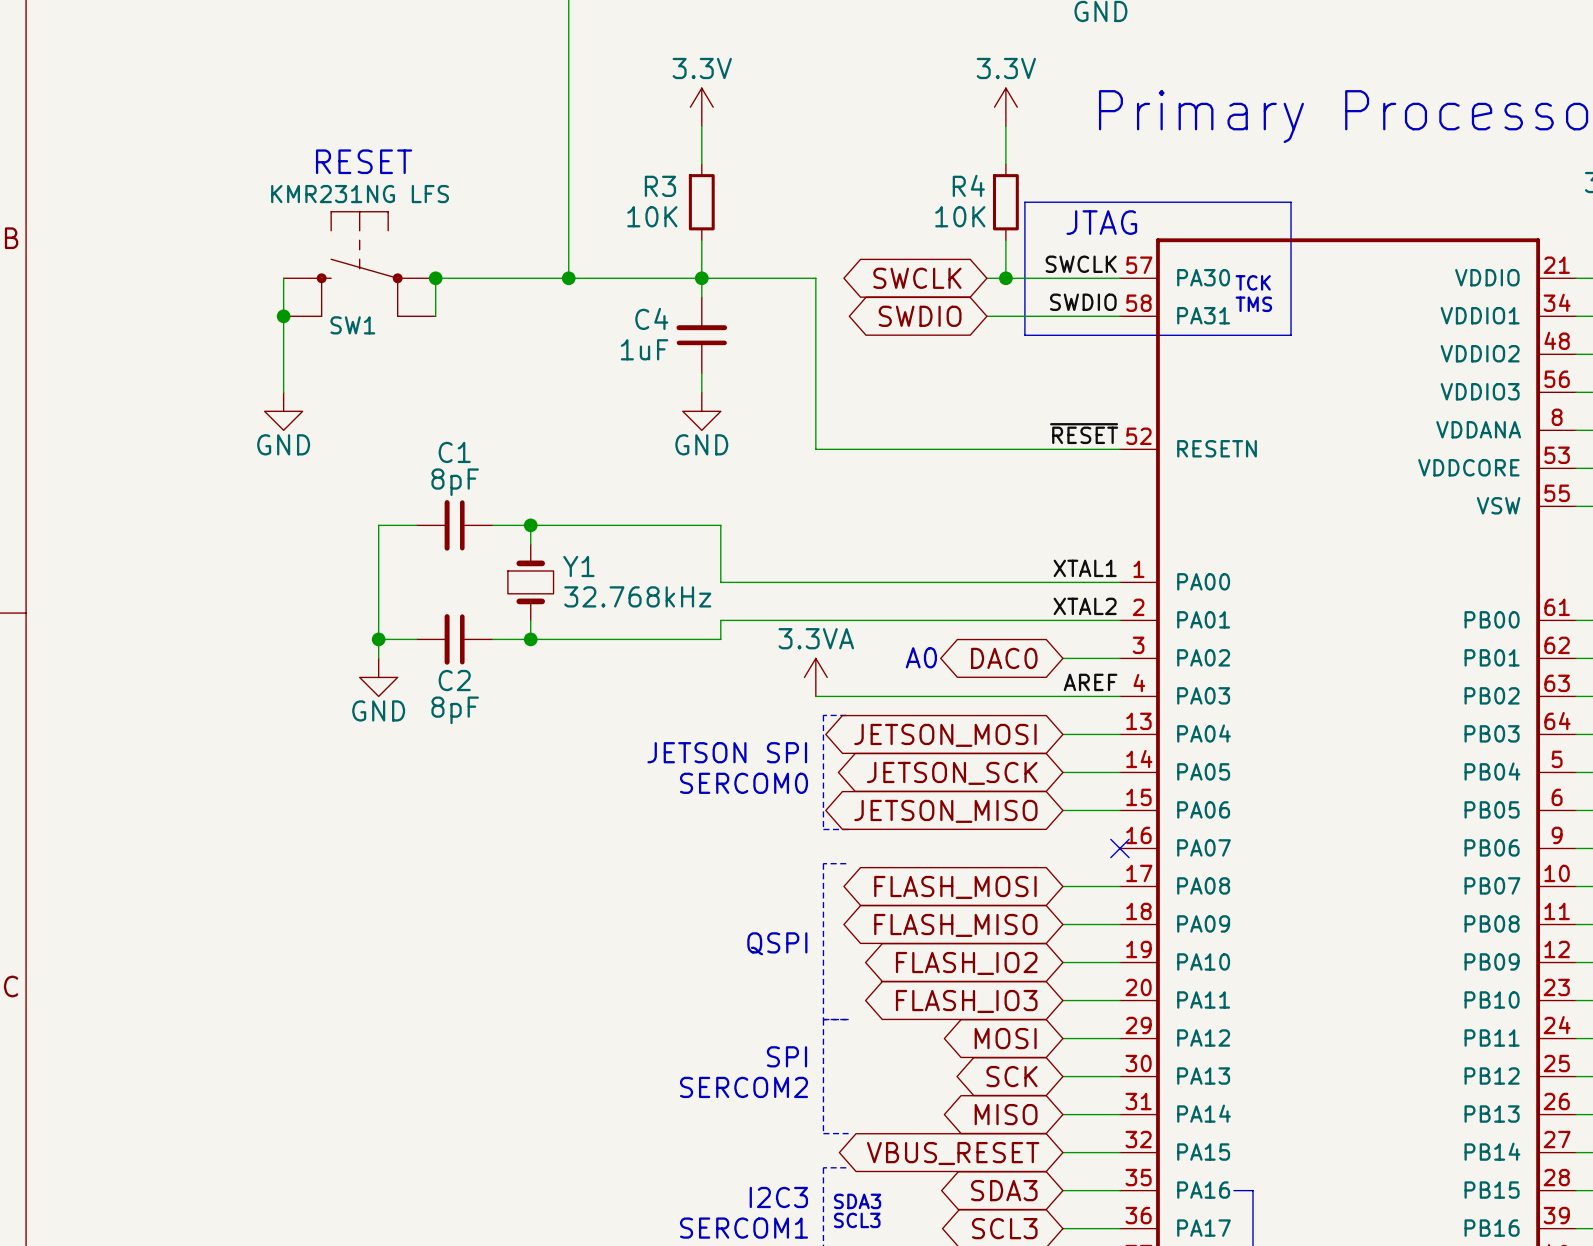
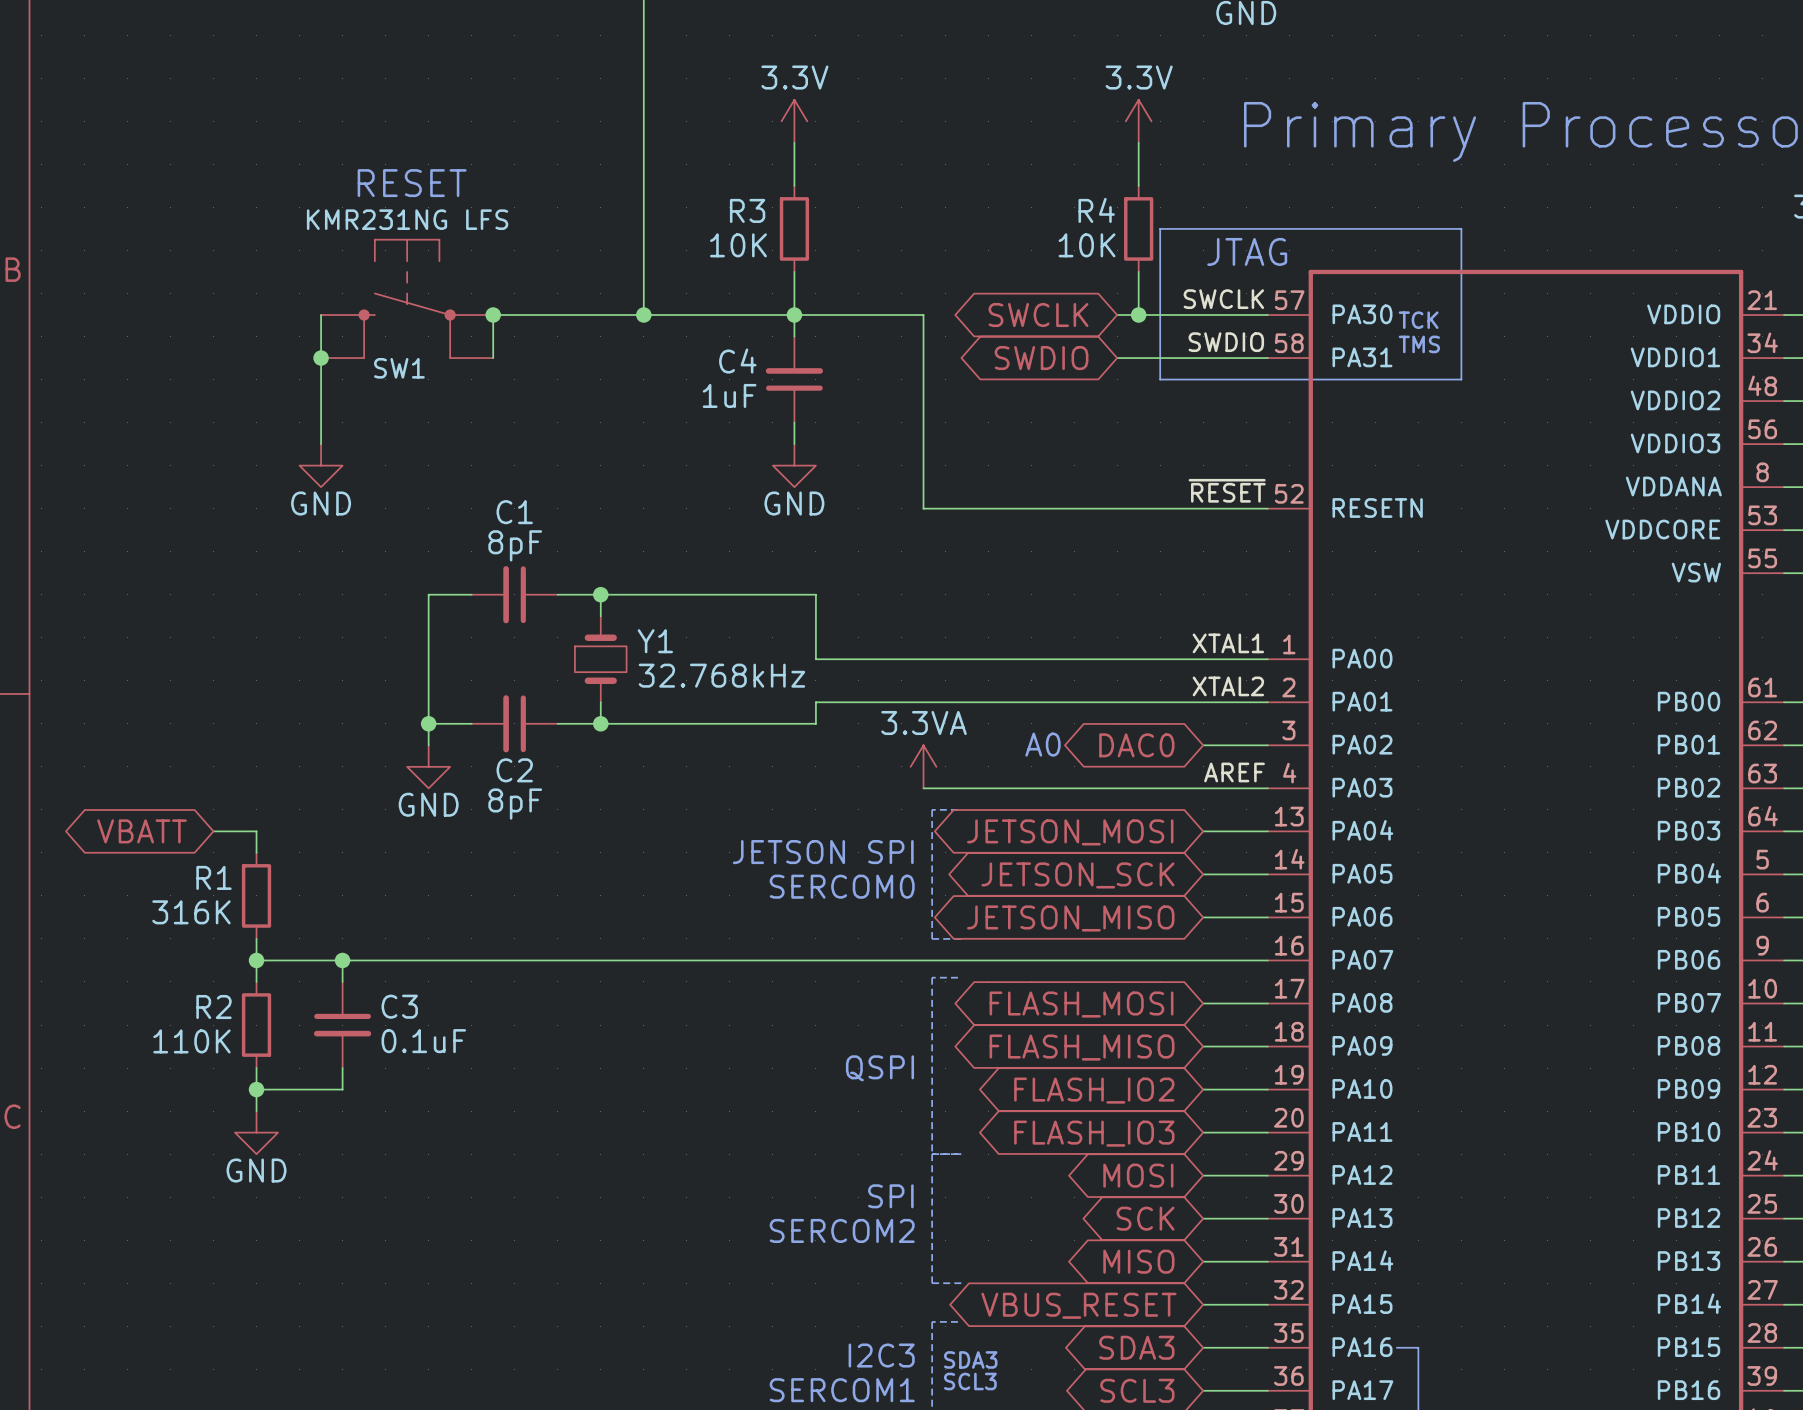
global label: none -> VBATT (141, 831)
wire: none -> (213, 831) (256, 831) (256, 852)
R1: none -> 316K (256, 895)
wire: none -> (256, 938) (256, 981)
wire: none -> (256, 960) (1267, 960)
junction: none -> (256, 960)
wire: none -> (342, 960) (342, 981)
junction: none -> (342, 960)
no-connect mark: (1119, 848) -> none
R2: none -> 110K (256, 1025)
C3: none -> 0.1uF (342, 1025)
wire: none -> (256, 1068) (256, 1111)
wire: none -> (342, 1068) (342, 1089) (256, 1089)
junction: none -> (256, 1089)
power symbol: none -> GND (256, 1132)

